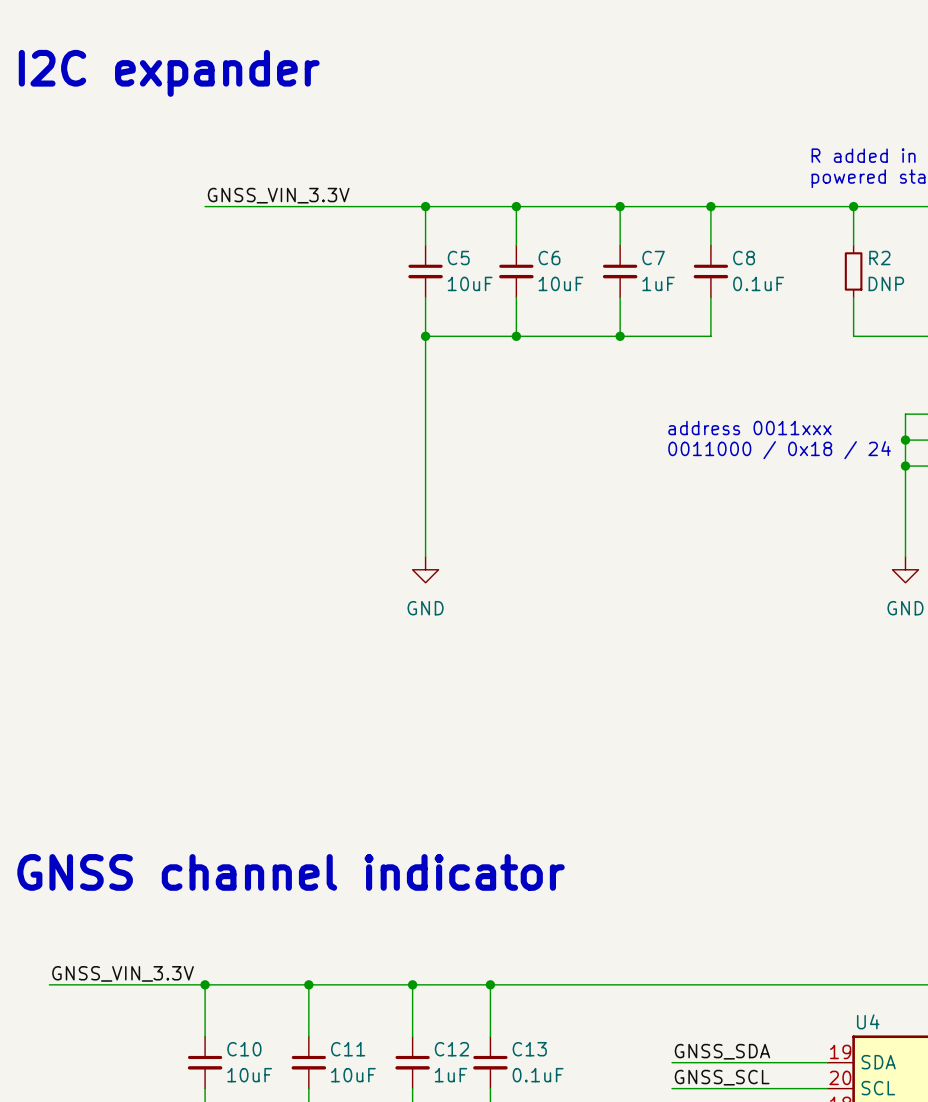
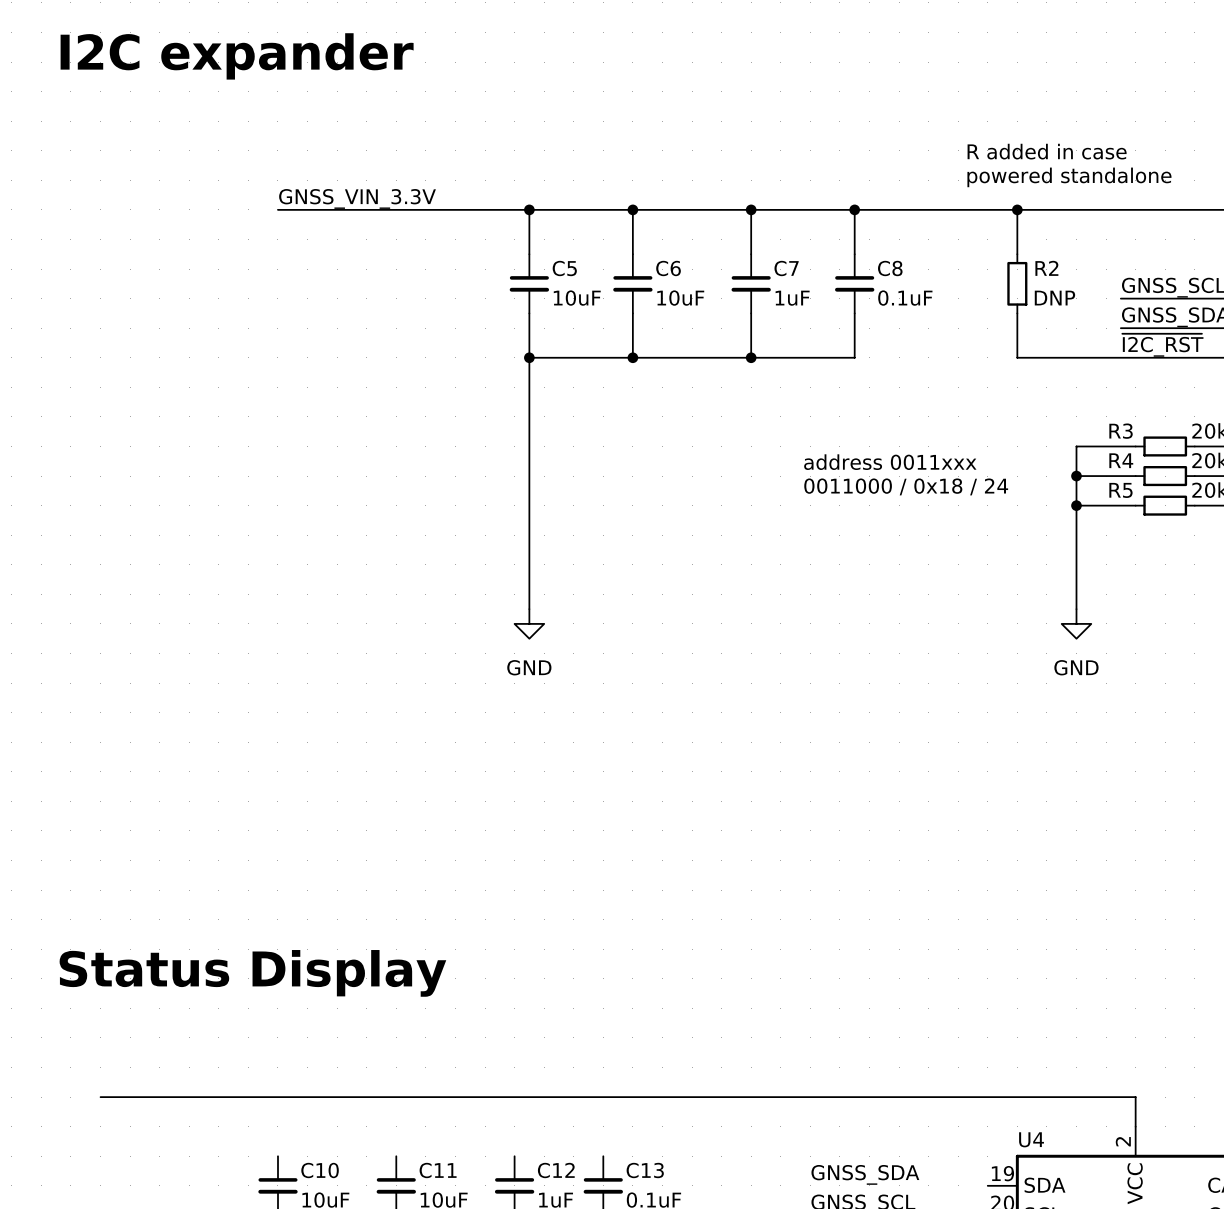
text: GNSS channel indicator (291, 872) -> Status Display (252, 973)
label: GNSS_VIN_3.3V (123, 973) -> none
wire: (205, 984) (205, 1036) -> none
junction: (205, 984) -> none
wire: (308, 984) (308, 1036) -> none
junction: (308, 984) -> none
wire: (412, 984) (412, 1036) -> none
junction: (412, 984) -> none
wire: (490, 984) (490, 1036) -> none
junction: (490, 984) -> none
wire: (672, 1062) (827, 1062) -> none

